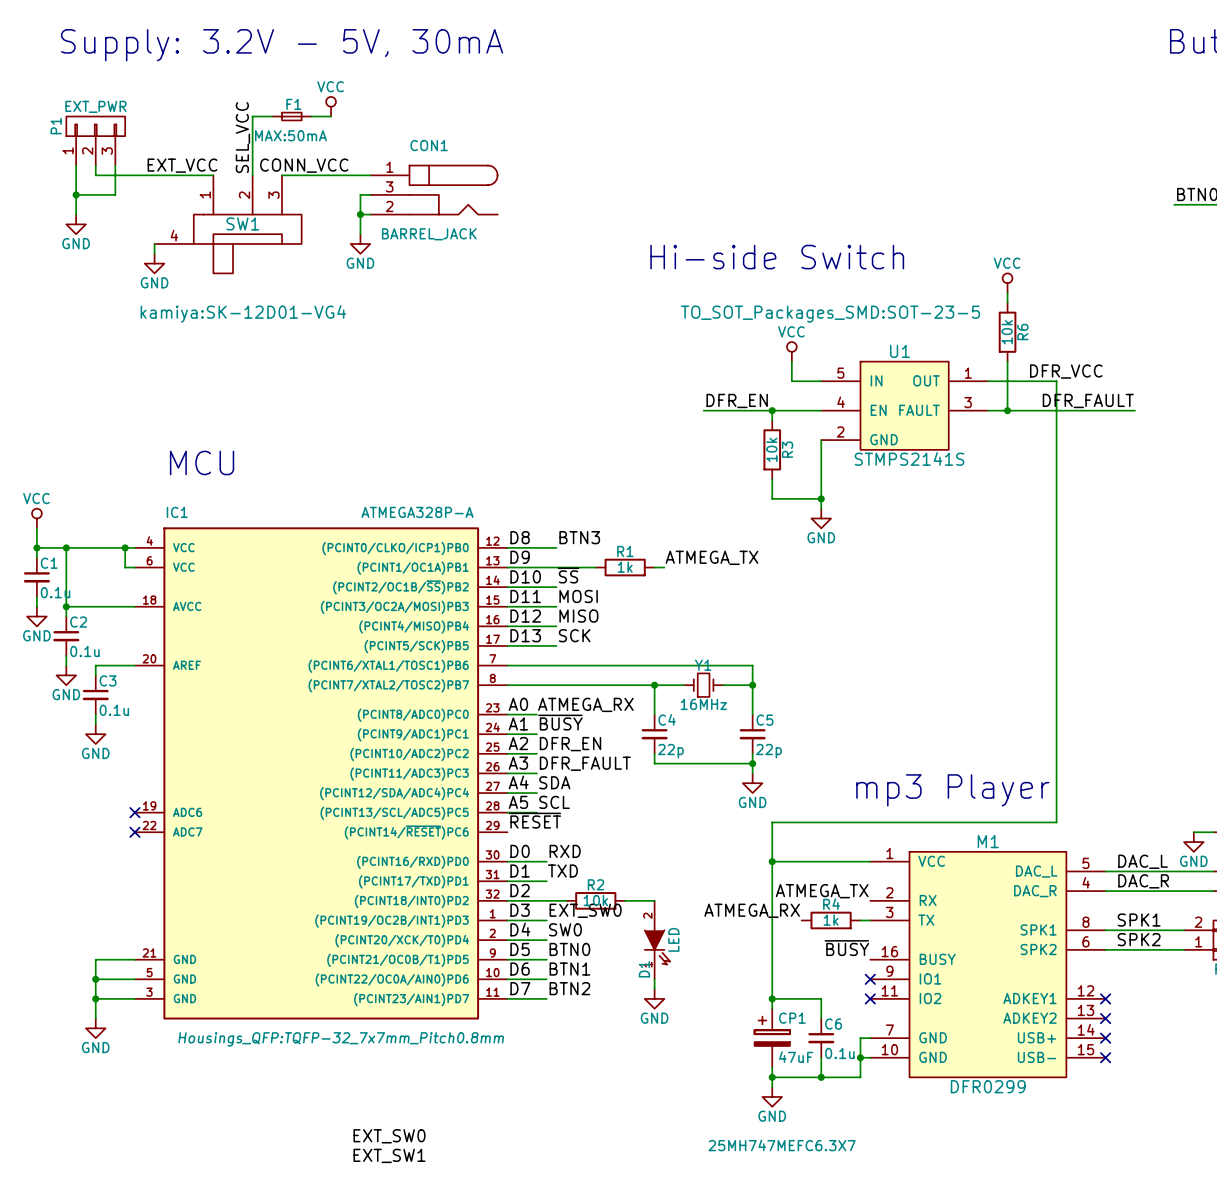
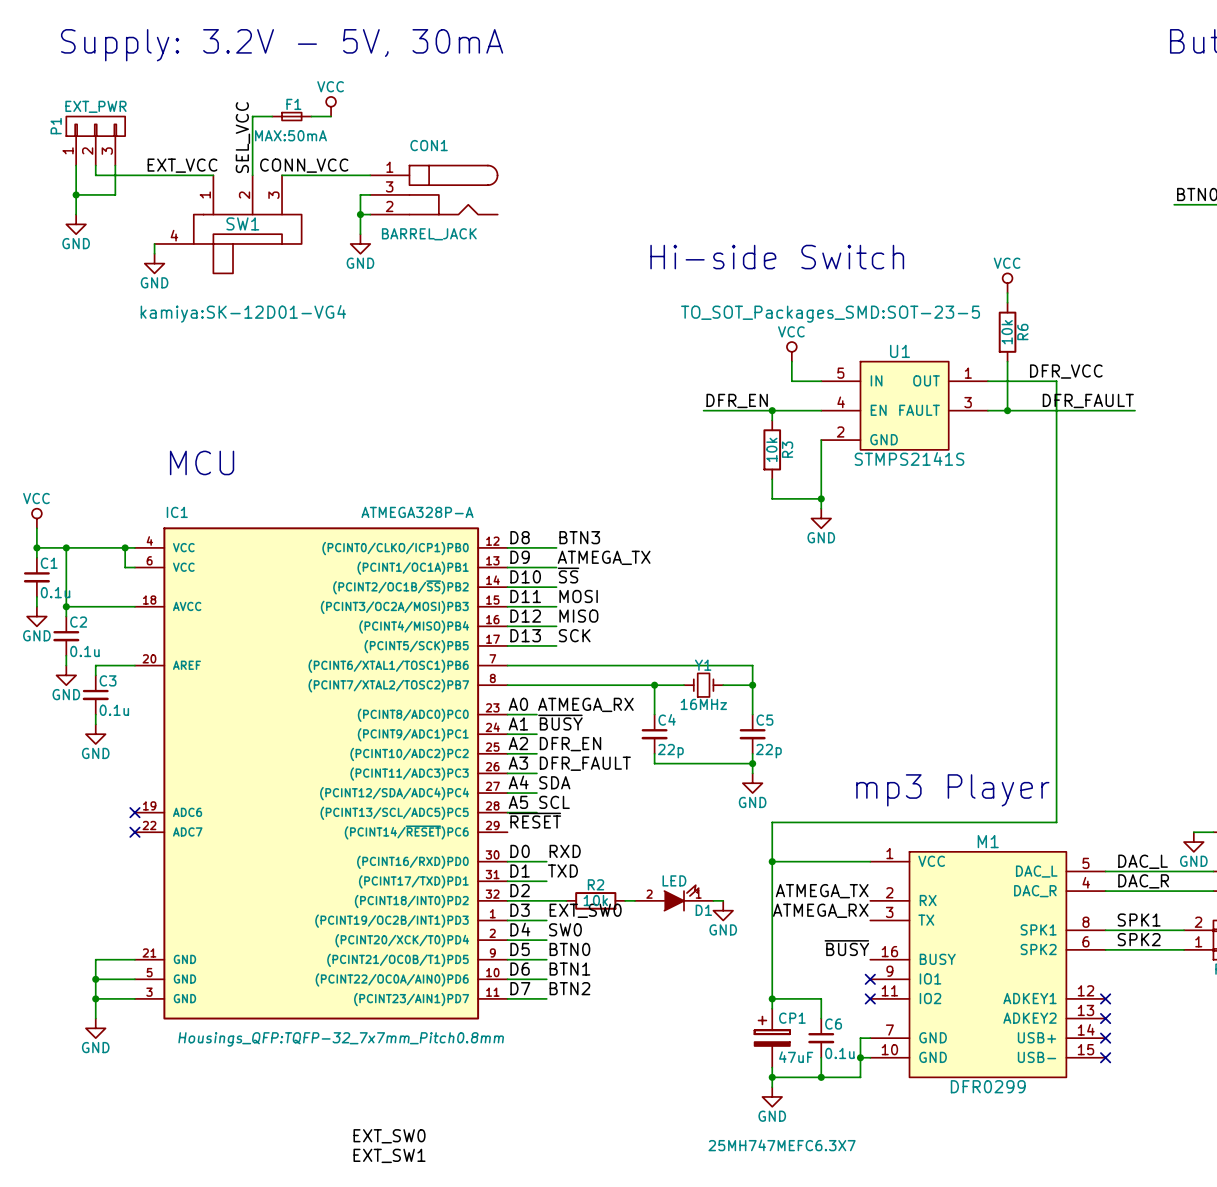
label position: ATMEGA_TX (711, 557) -> ATMEGA_TX (604, 557)
wire: (556, 567) (595, 567) -> none
R1: 1k (625, 567) -> none
wire: (654, 567) (664, 567) -> none
label position: ATMEGA_RX (752, 910) -> ATMEGA_RX (820, 910)
R4: 1k (831, 920) -> none
wire: (860, 920) (870, 920) -> (713, 900) (723, 900)
D1 rotation: 0° (657, 947) -> 90° counterclockwise (681, 897)
wire: (654, 979) (654, 989) -> none
power symbol position: GND (654, 998) -> GND (723, 910)

